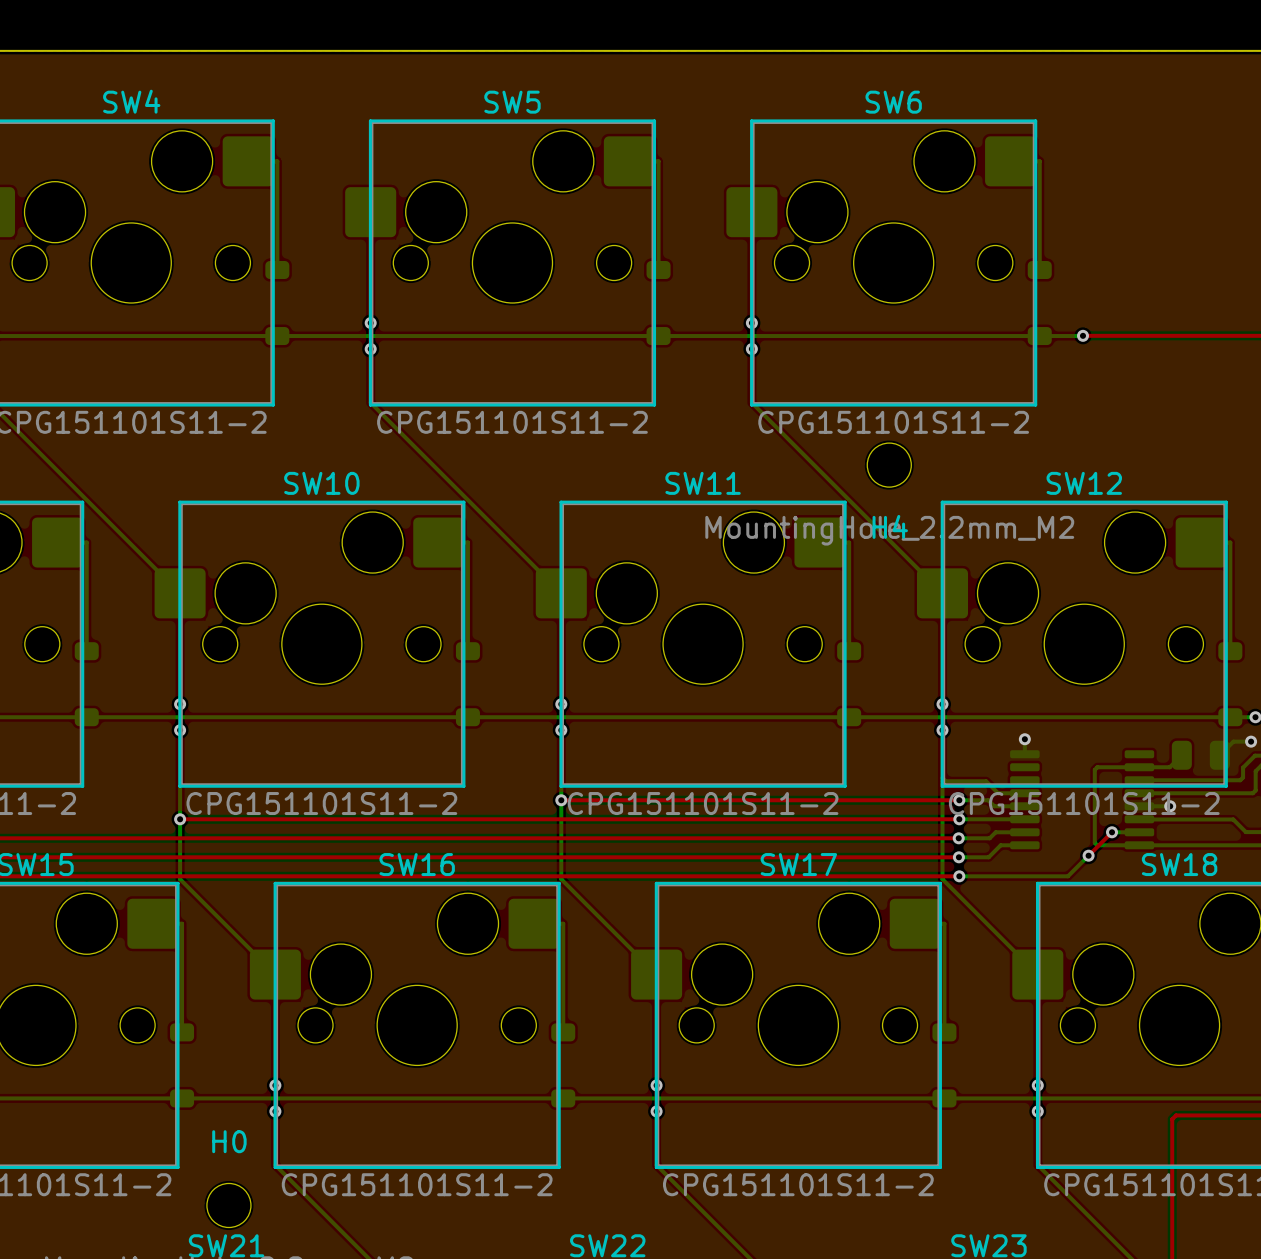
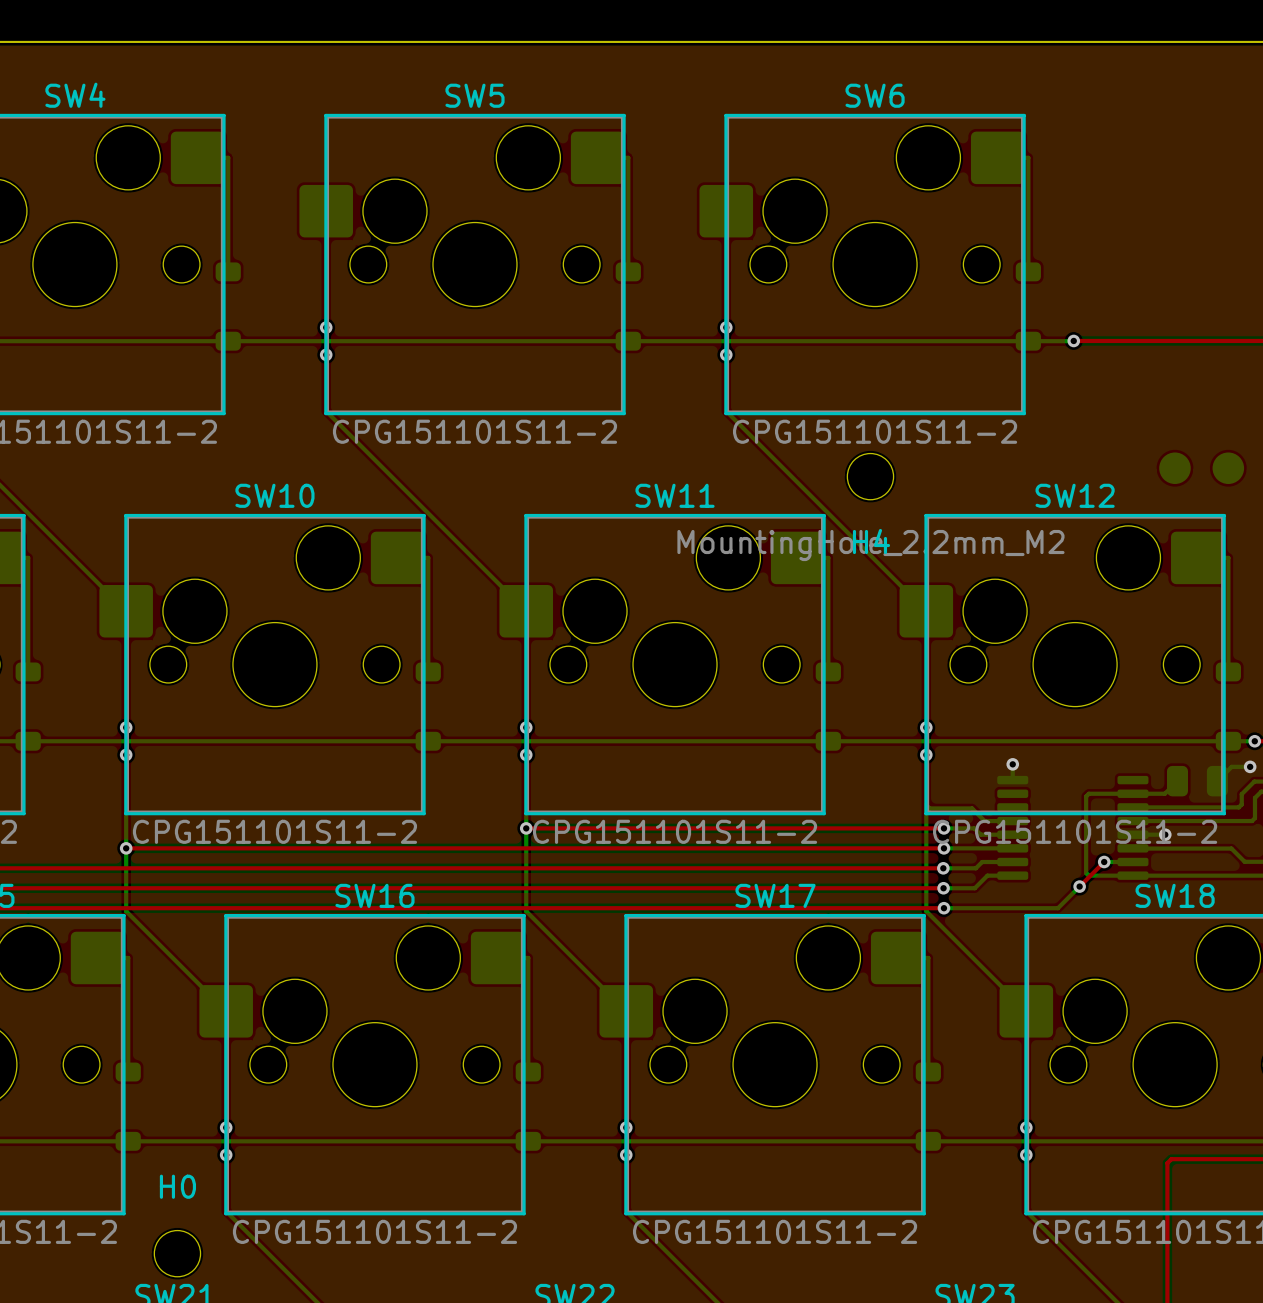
part: none -> (1174, 468)
part: none -> (1228, 468)

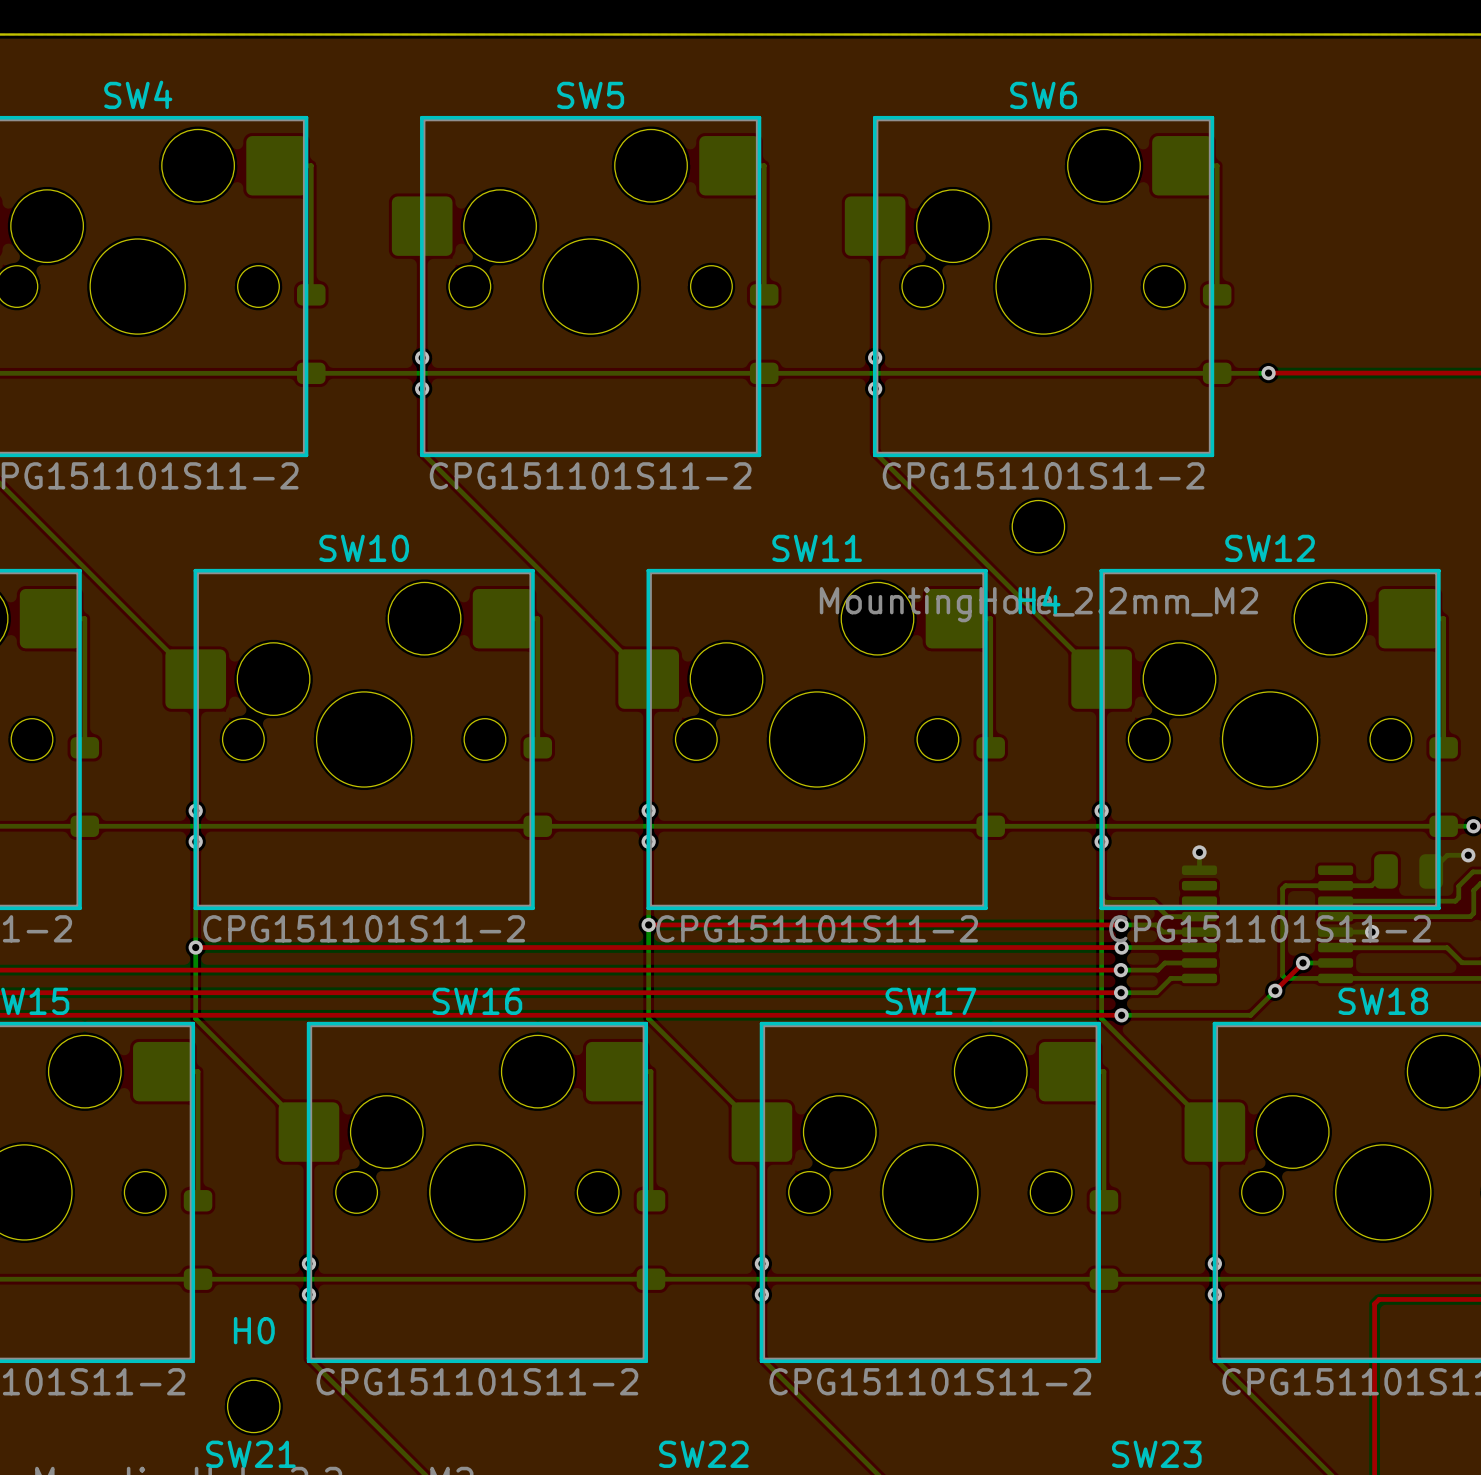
part: (1174, 468) -> none
part: (1228, 468) -> none

